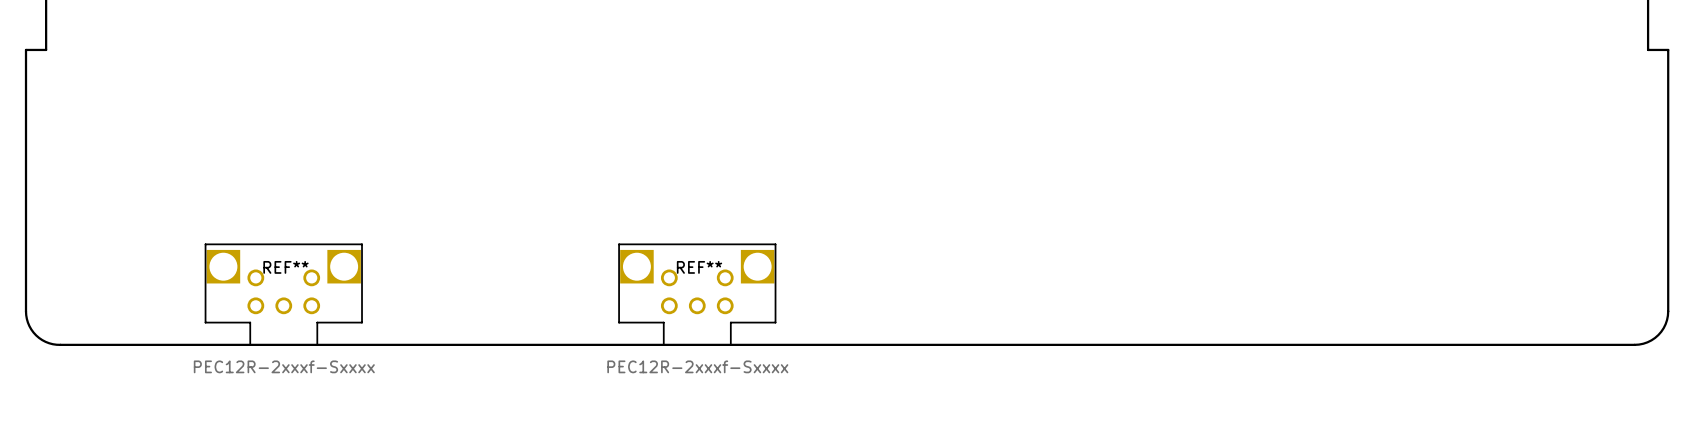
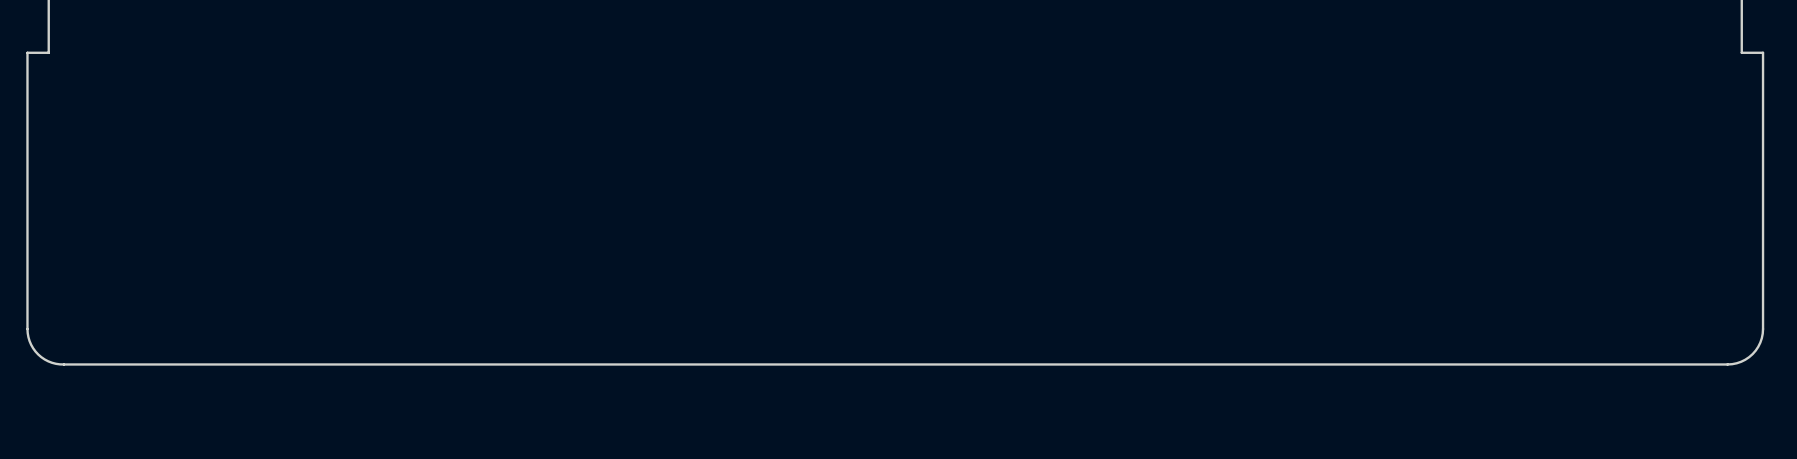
REF**: PEC12R-2xxxf-Sxxxx (283, 294) -> none
REF**: PEC12R-2xxxf-Sxxxx (697, 294) -> none

